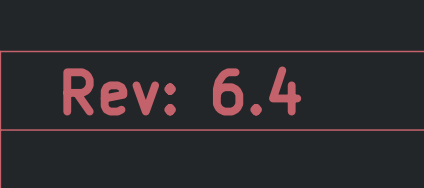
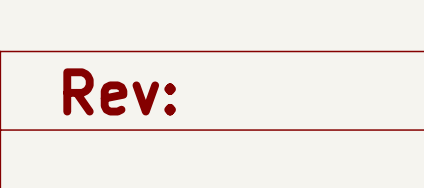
title block: Rev: 6.4 (182, 90) -> Rev: (119, 91)

